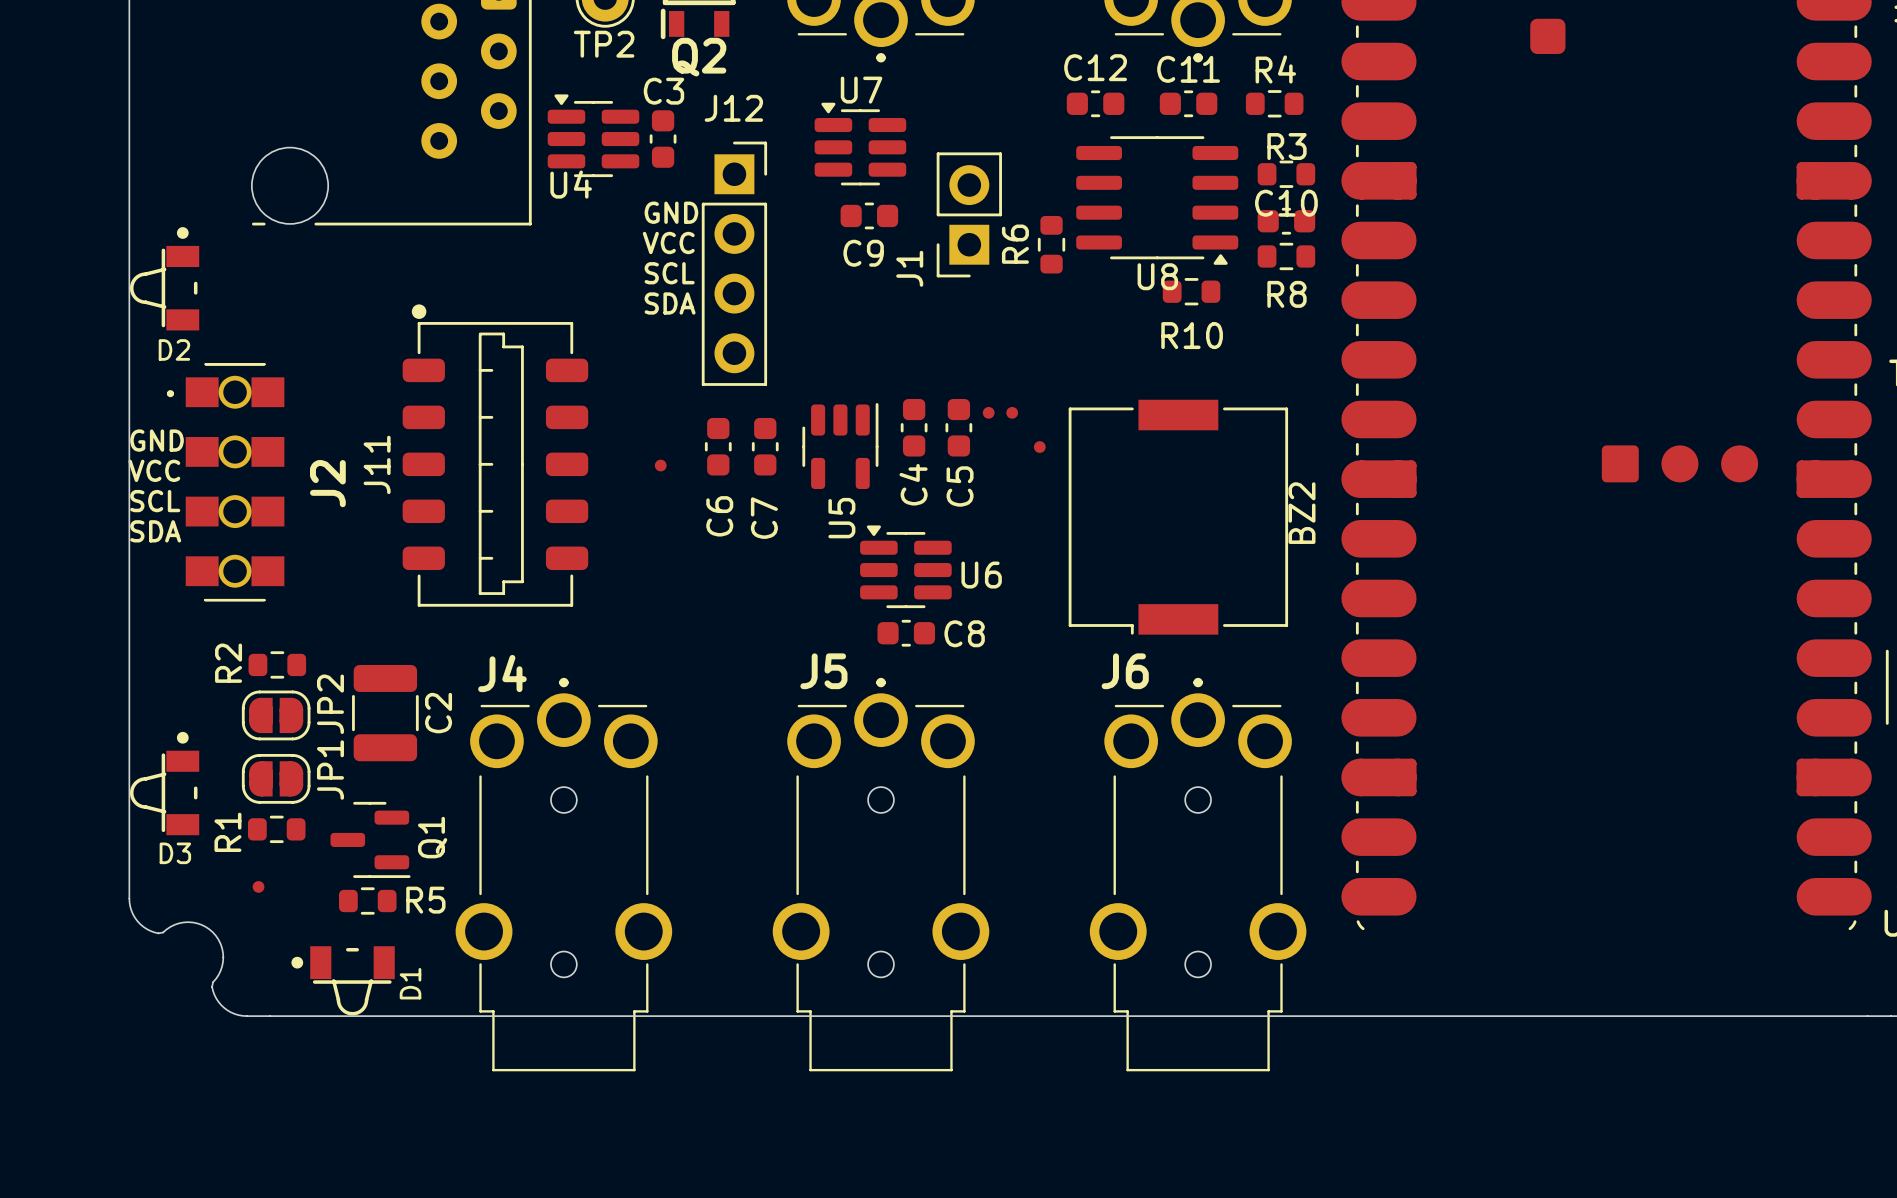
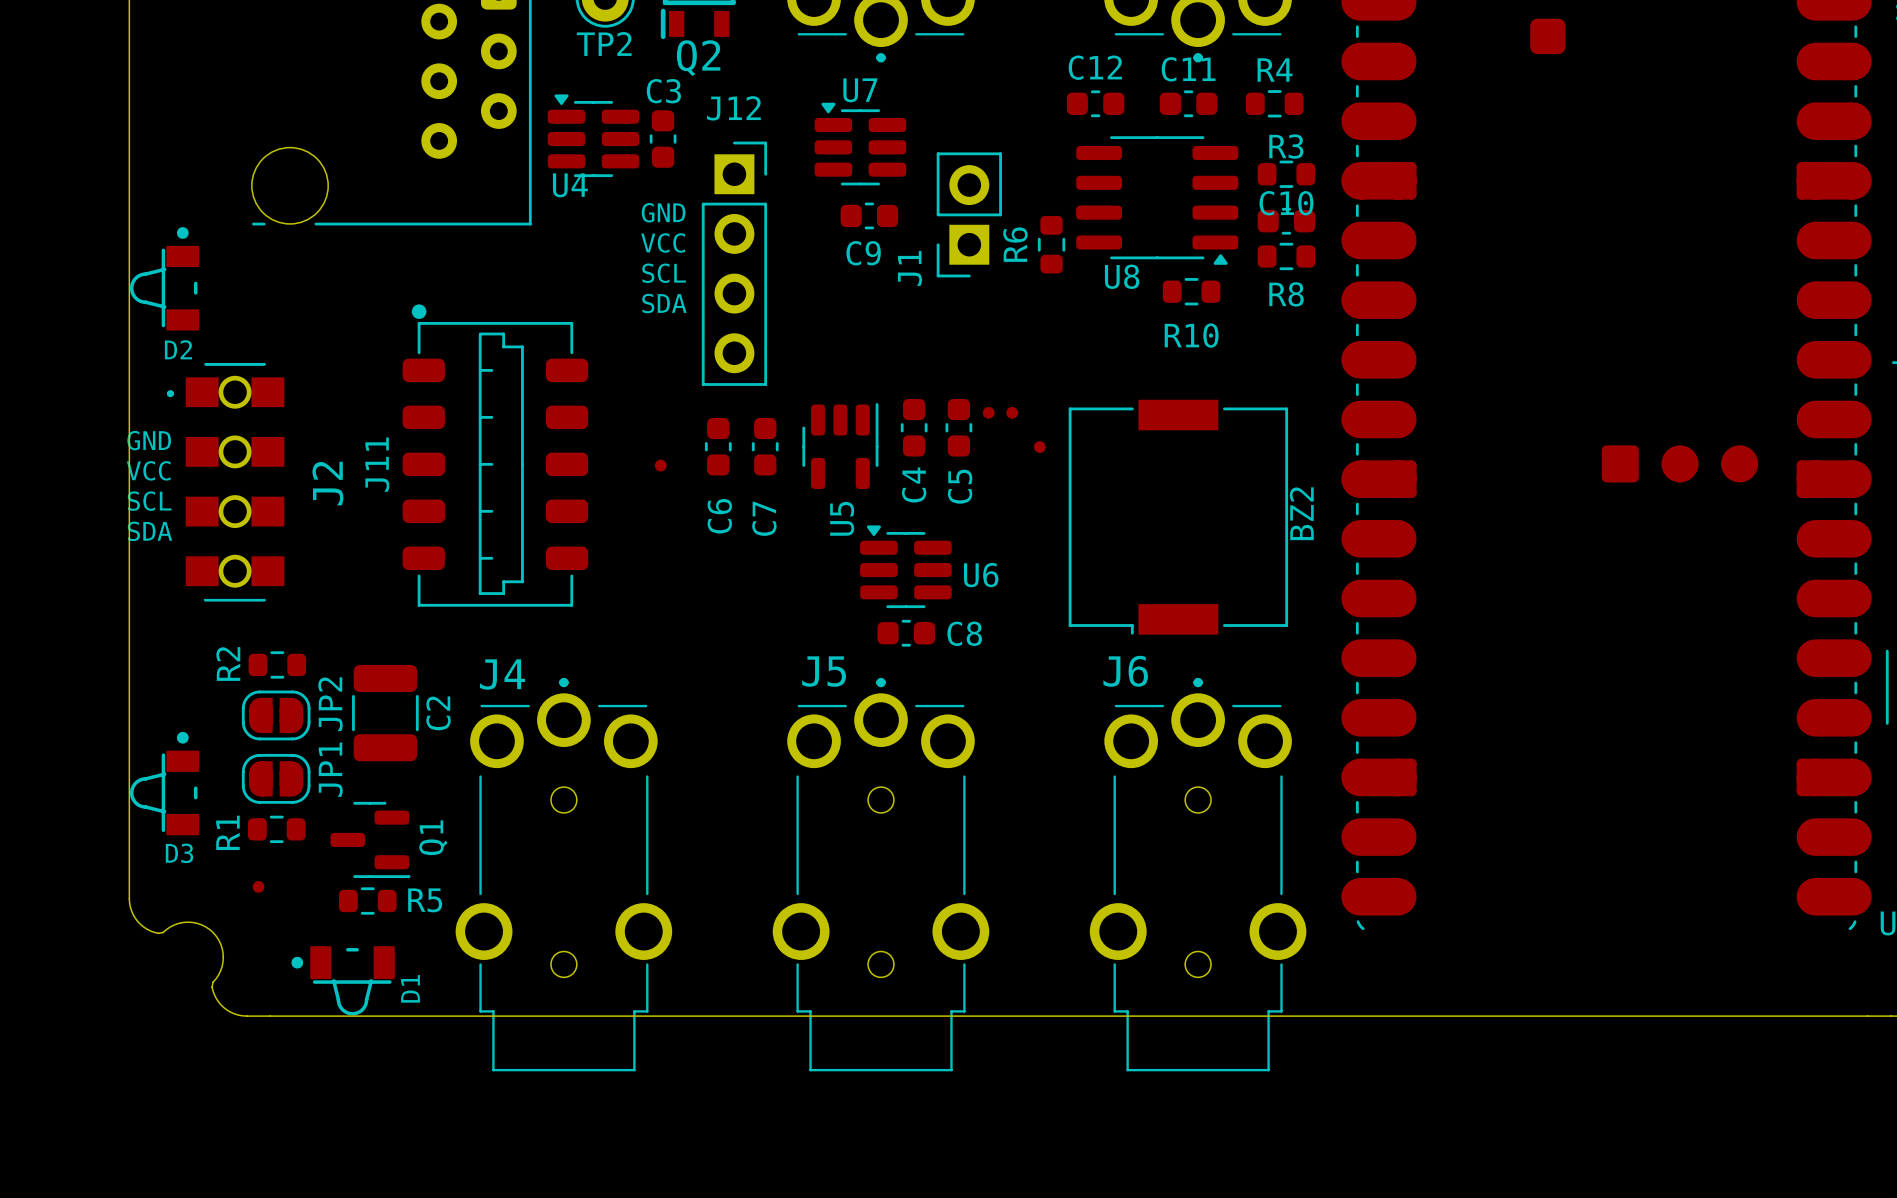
U8 name position: U8 (1157, 276) -> U8 (1122, 276)

